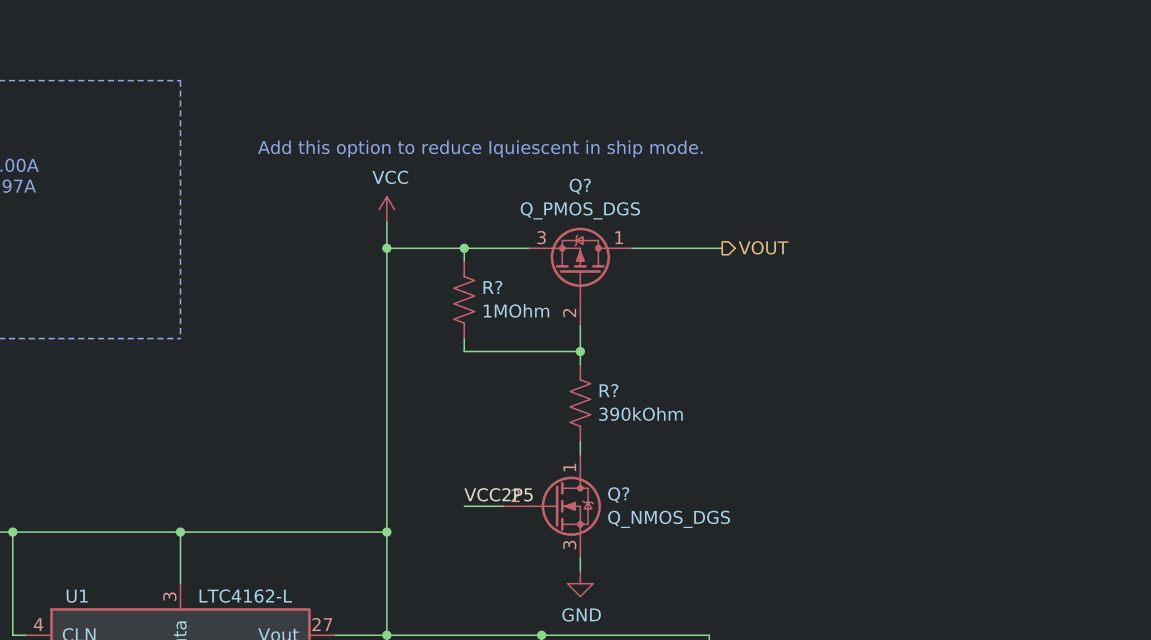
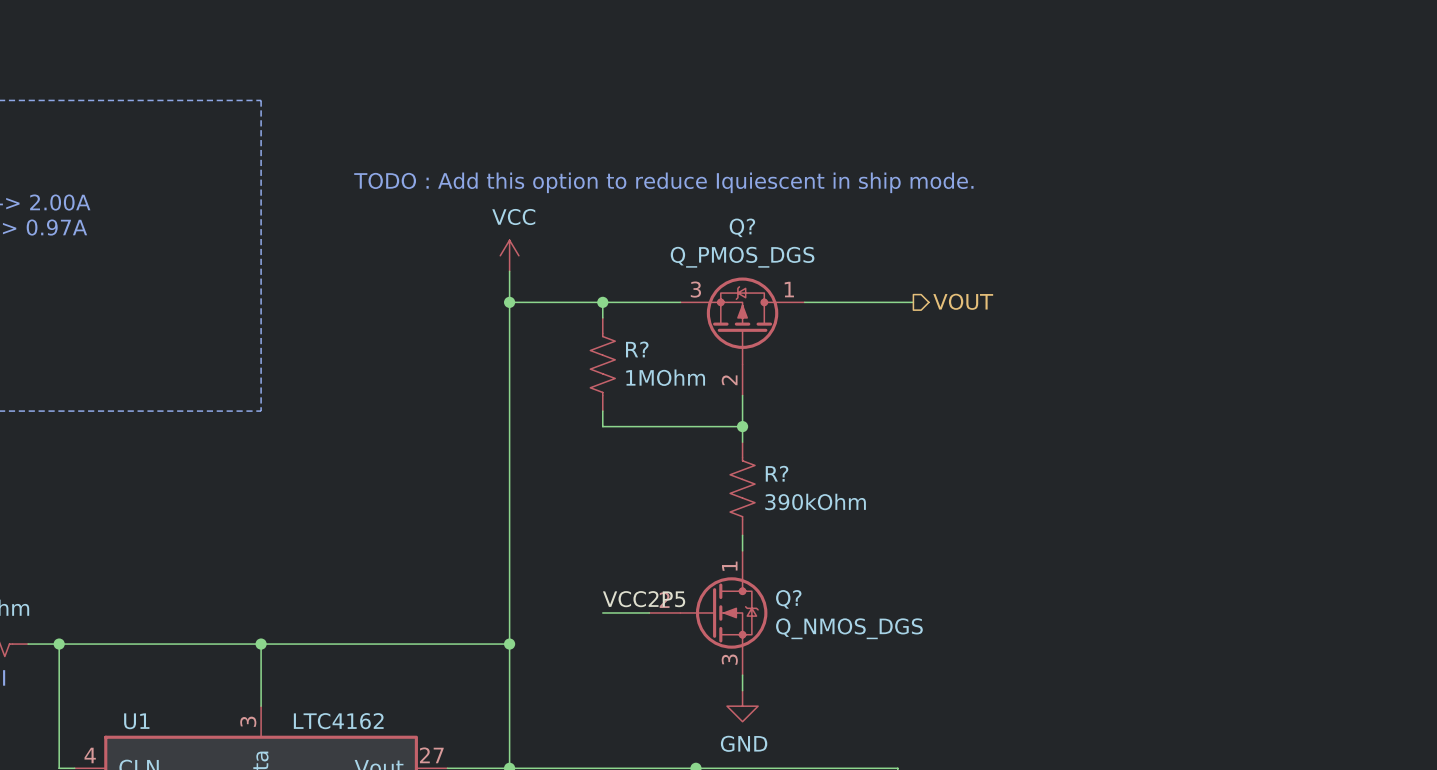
text: Add this option to reduce Iquiescent in ship mode. (480, 149) -> TODO : Add this option to reduce Iquiescent in ship mode. (663, 182)
U1 value: LTC4162-L (245, 596) -> LTC4162 (338, 721)

